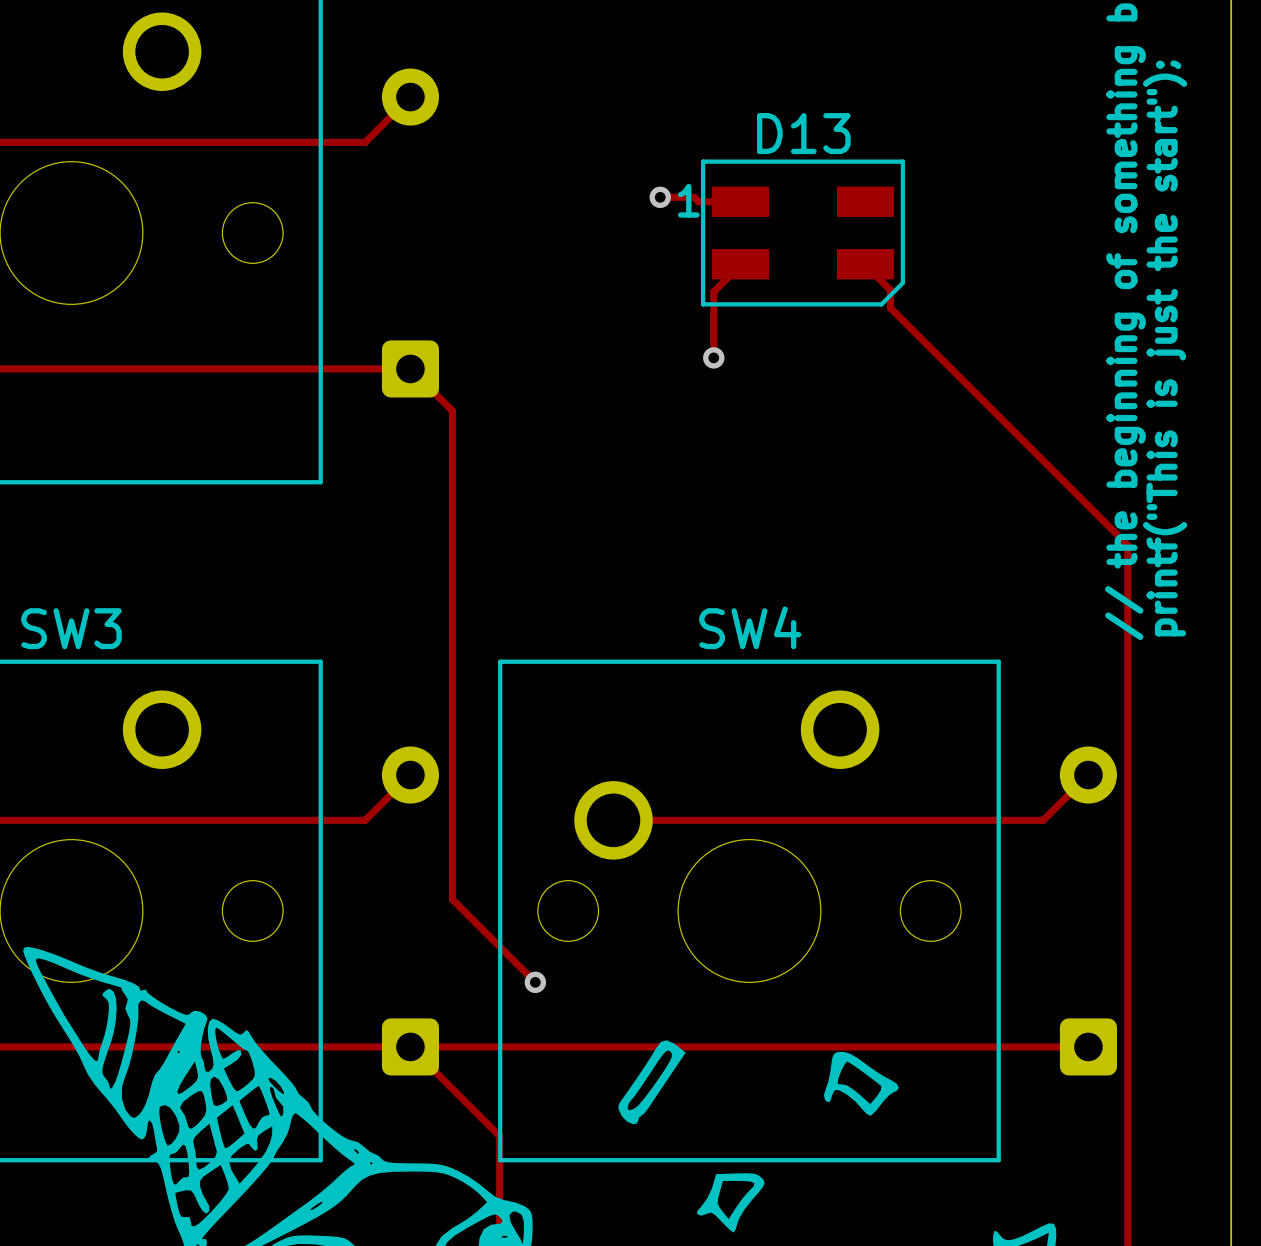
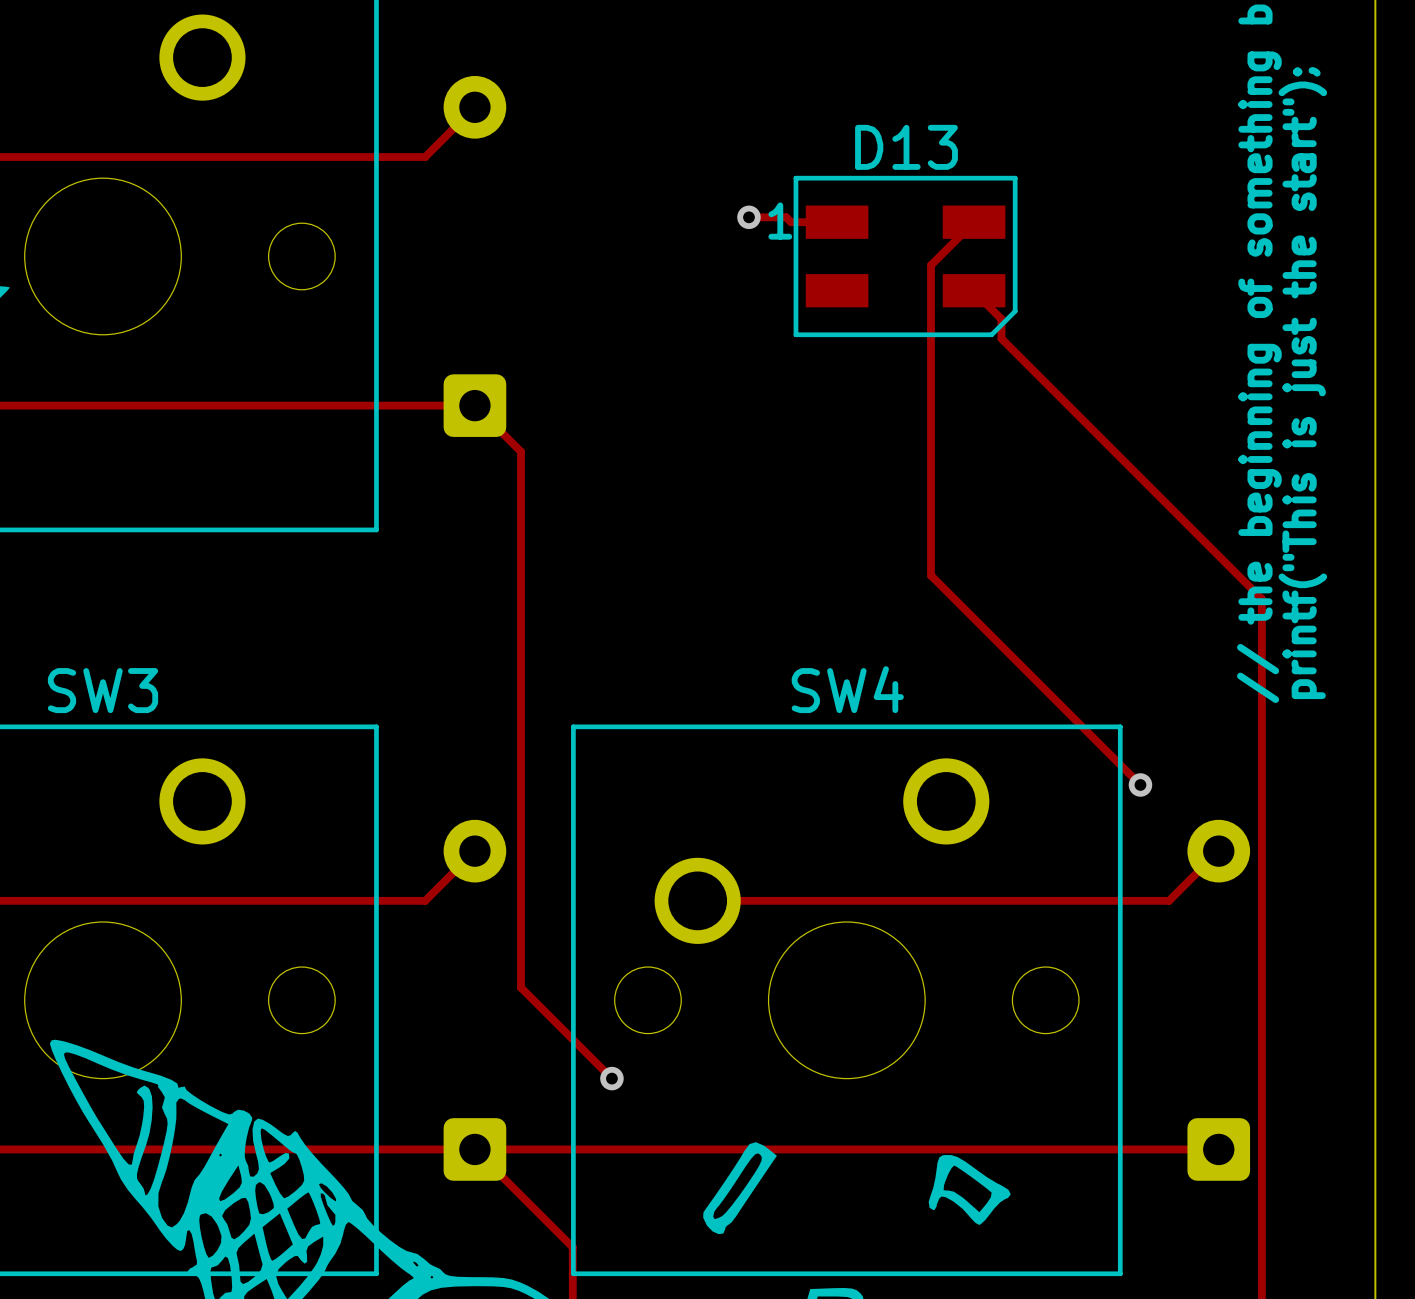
track: none -> (974, 222) (930, 265) (930, 575) (1140, 784)
track: (740, 265) (713, 291) (713, 357) -> none
via: (713, 357) -> none
via: none -> (1140, 784)

